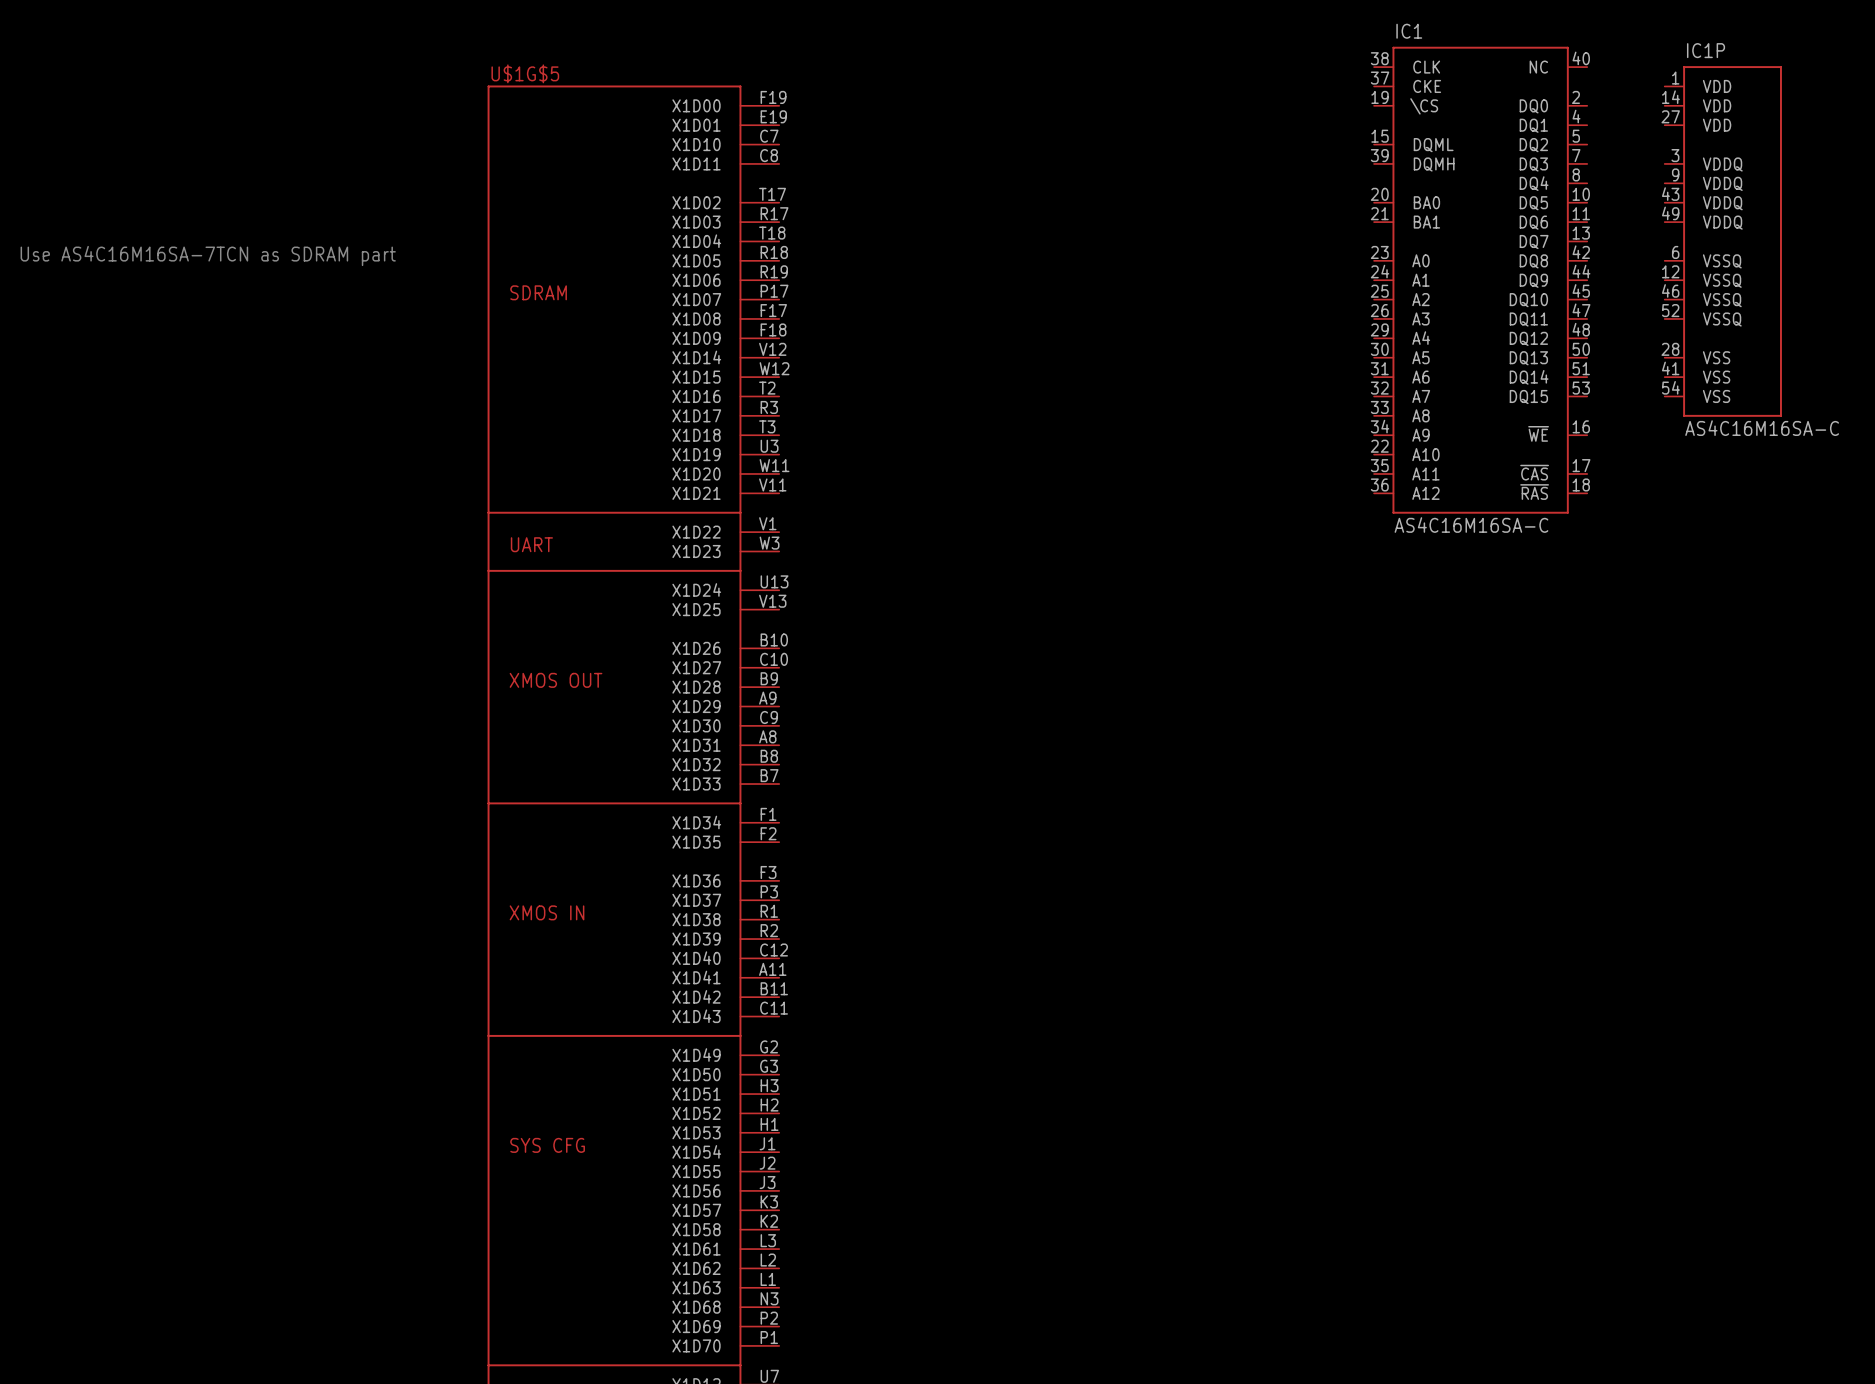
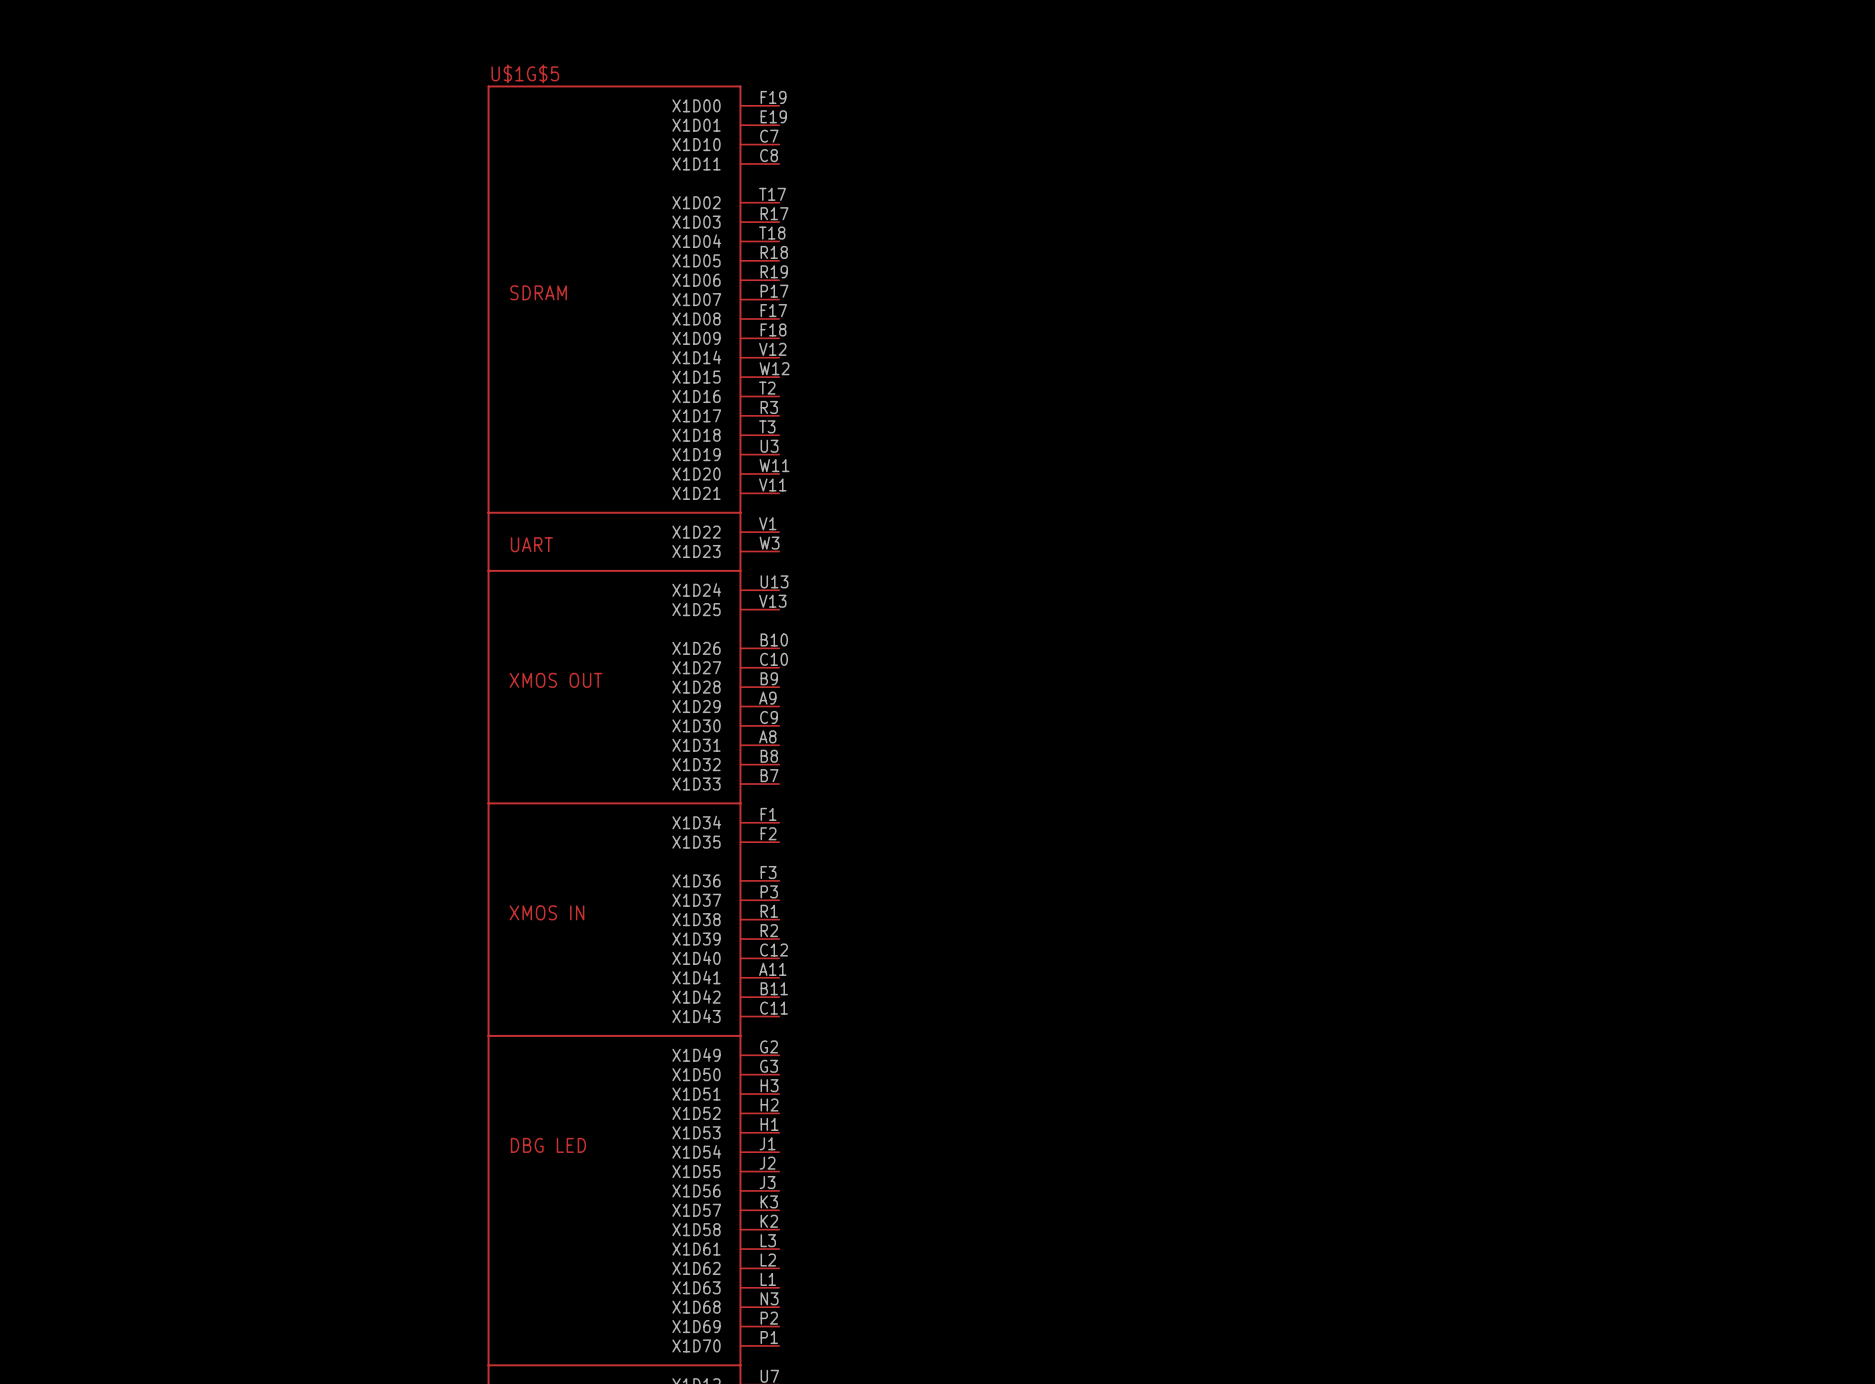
IC1P: AS4C16M16SA-C (1723, 241) -> none
text: Use AS4C16M16SA-7TCN as SDRAM part (208, 256) -> none
IC1: AS4C16M16SA-C (1480, 280) -> none
U$1G$5 text: SYS CFG (547, 1145) -> DBG LED (548, 1145)

